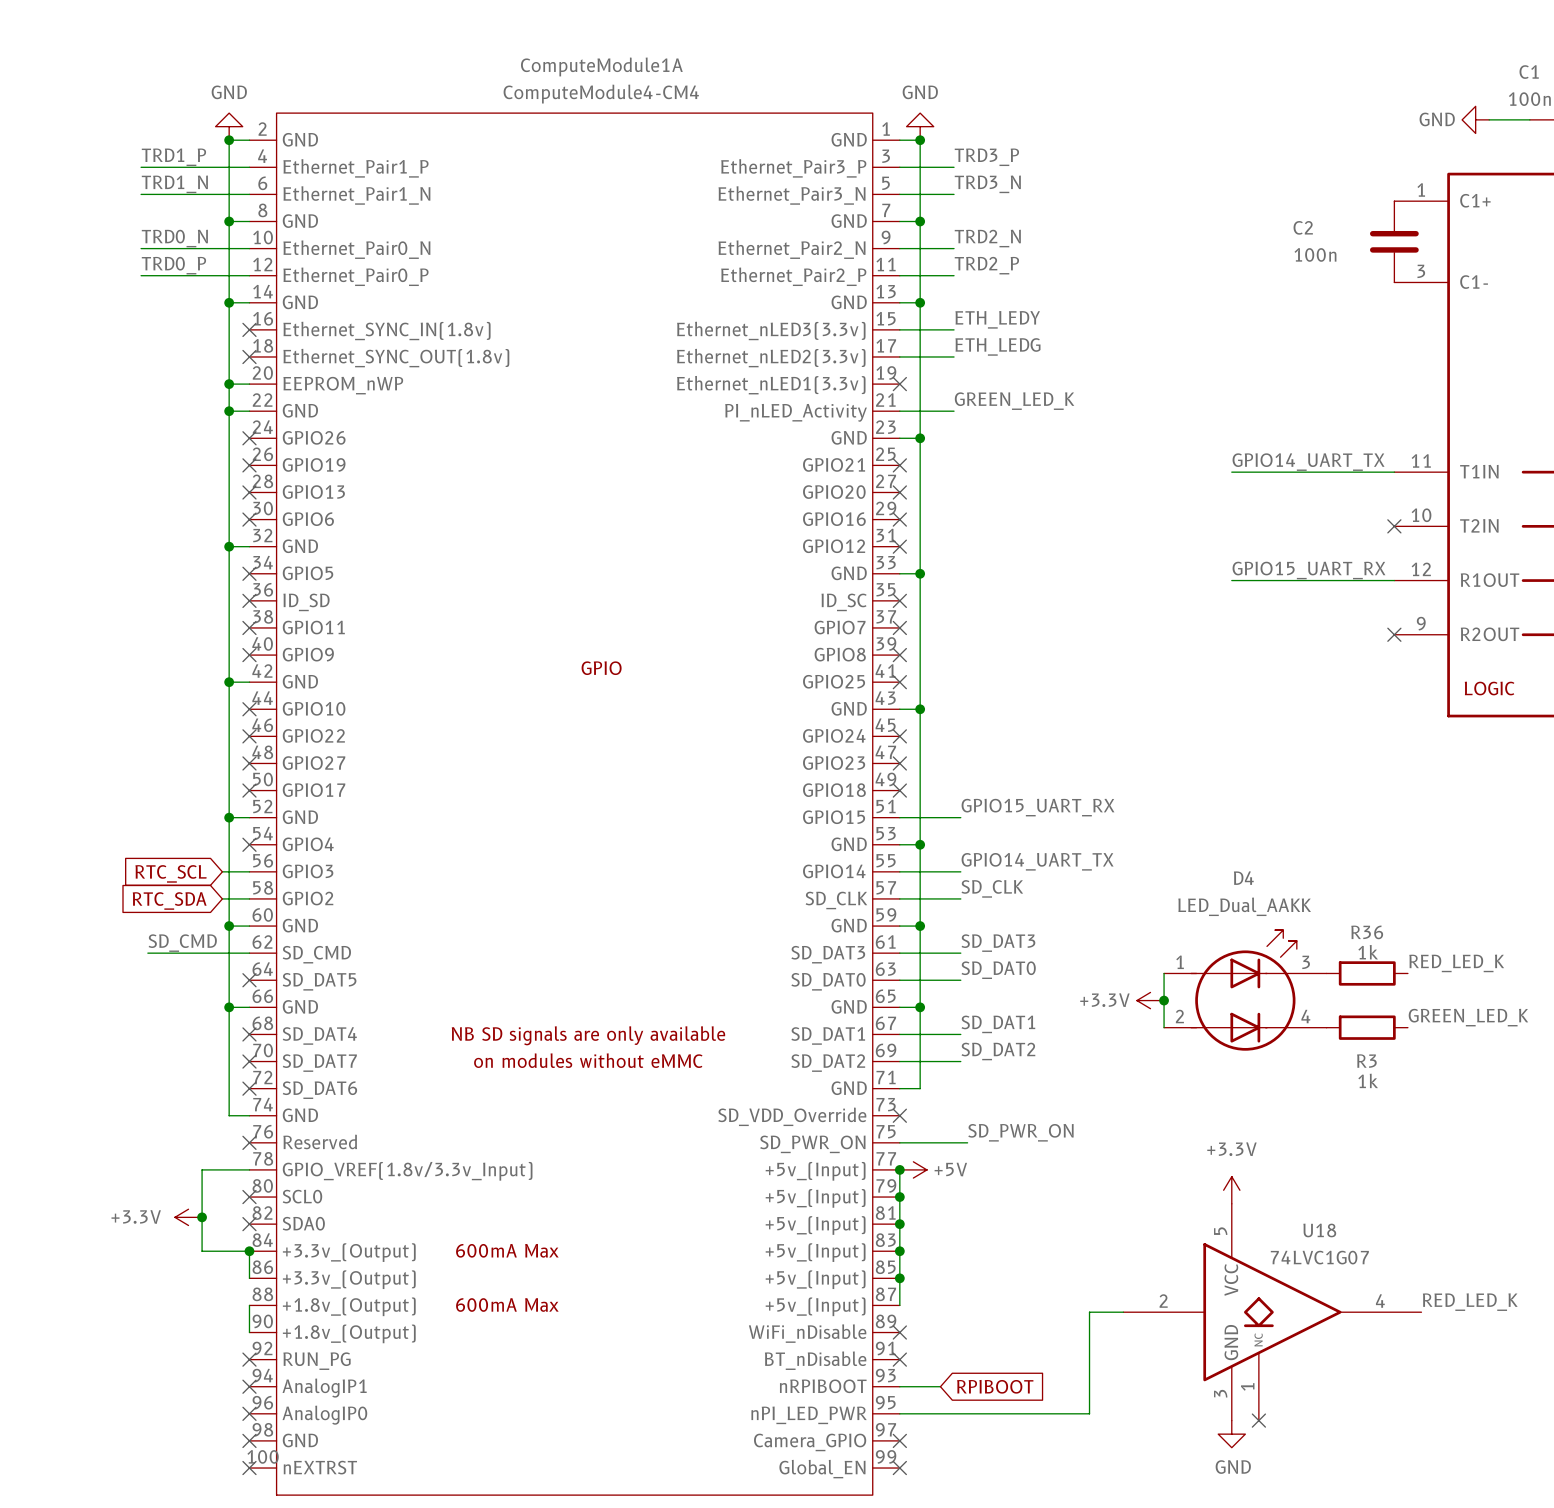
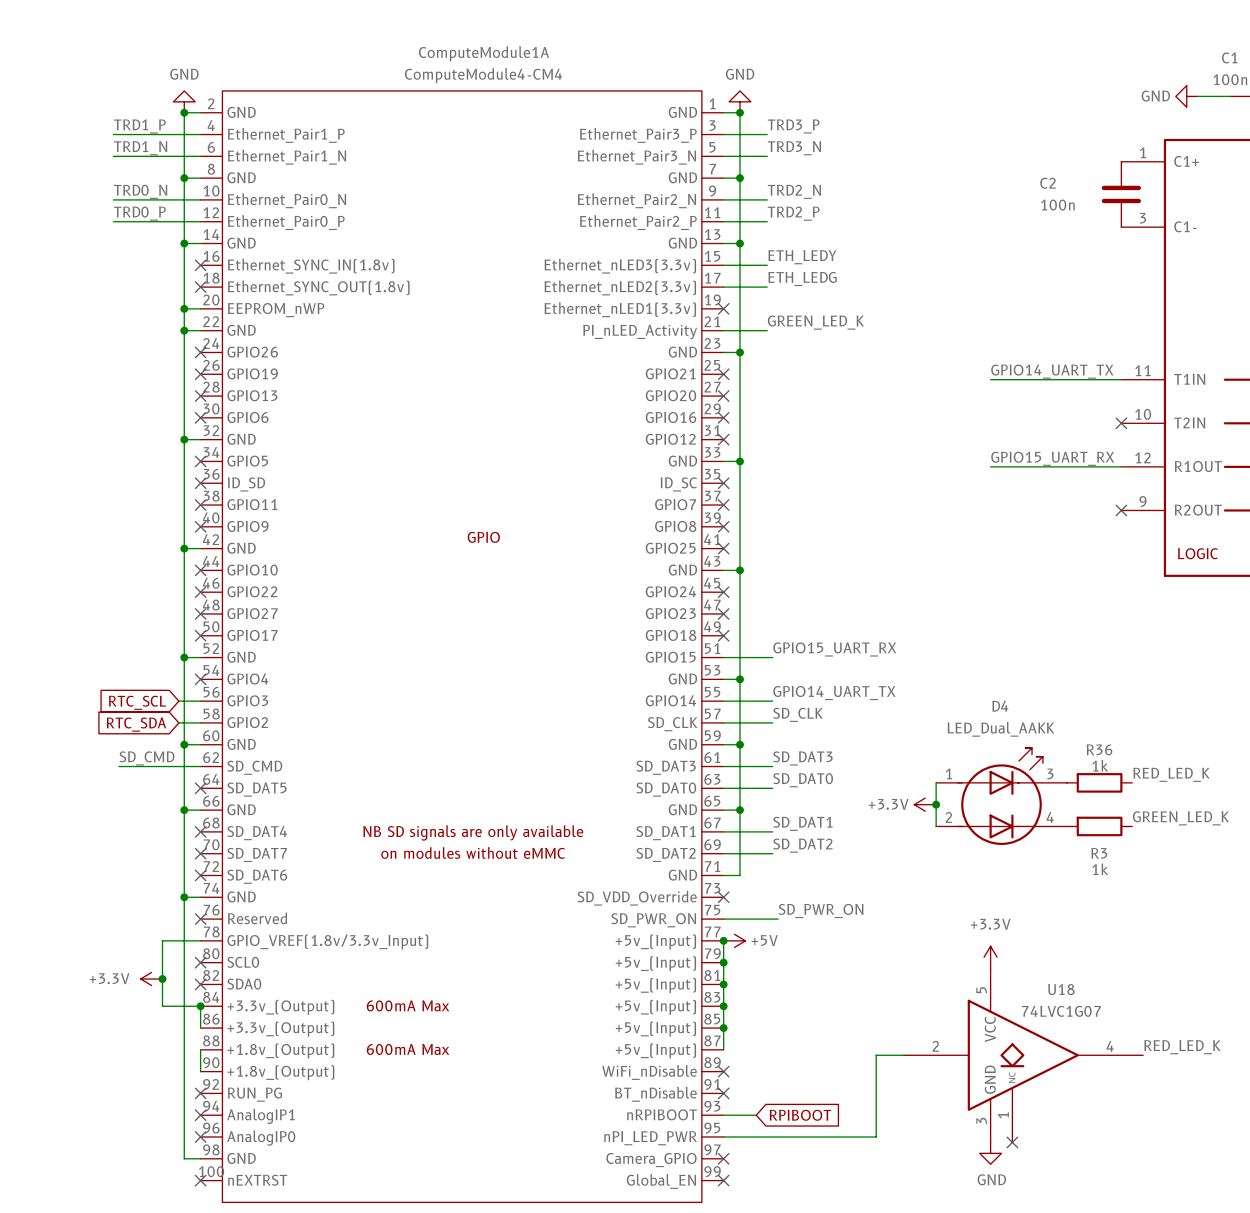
wire: none -> (184, 897) (184, 1158) (200, 1158)
junction: none -> (184, 897)
no-connect mark: (249, 1440) -> none

